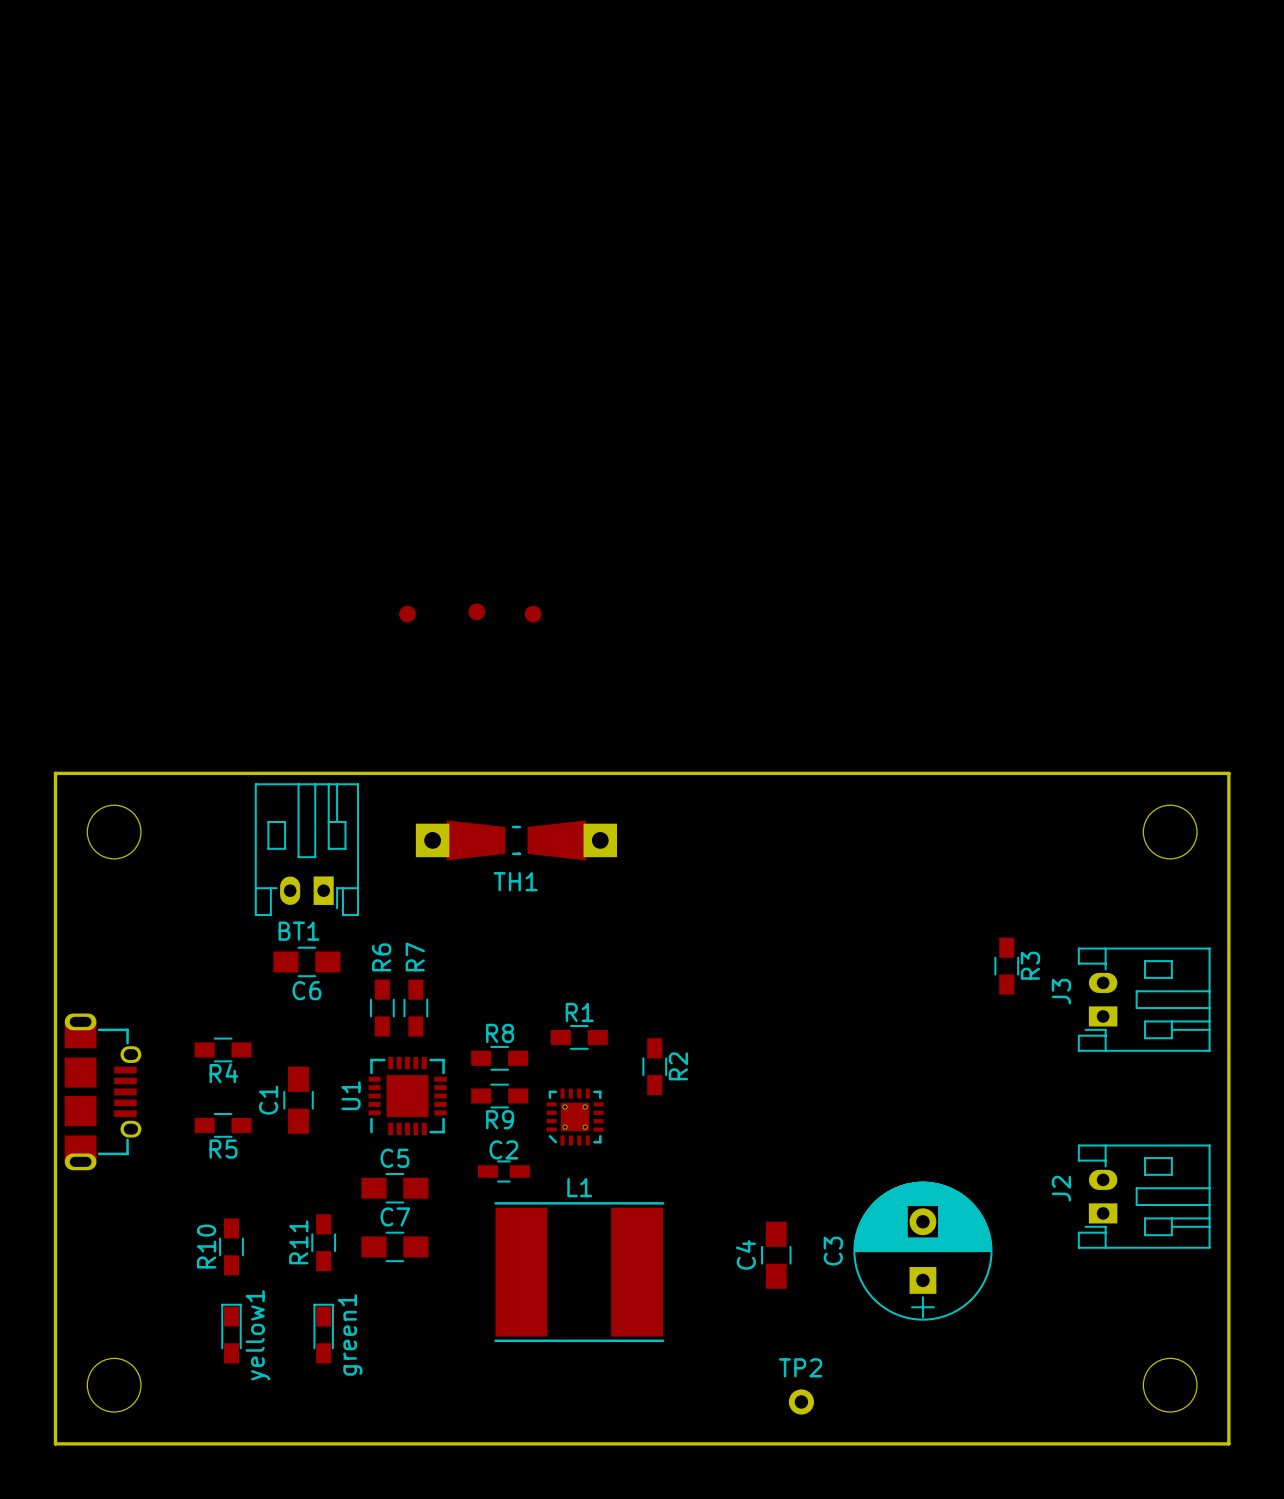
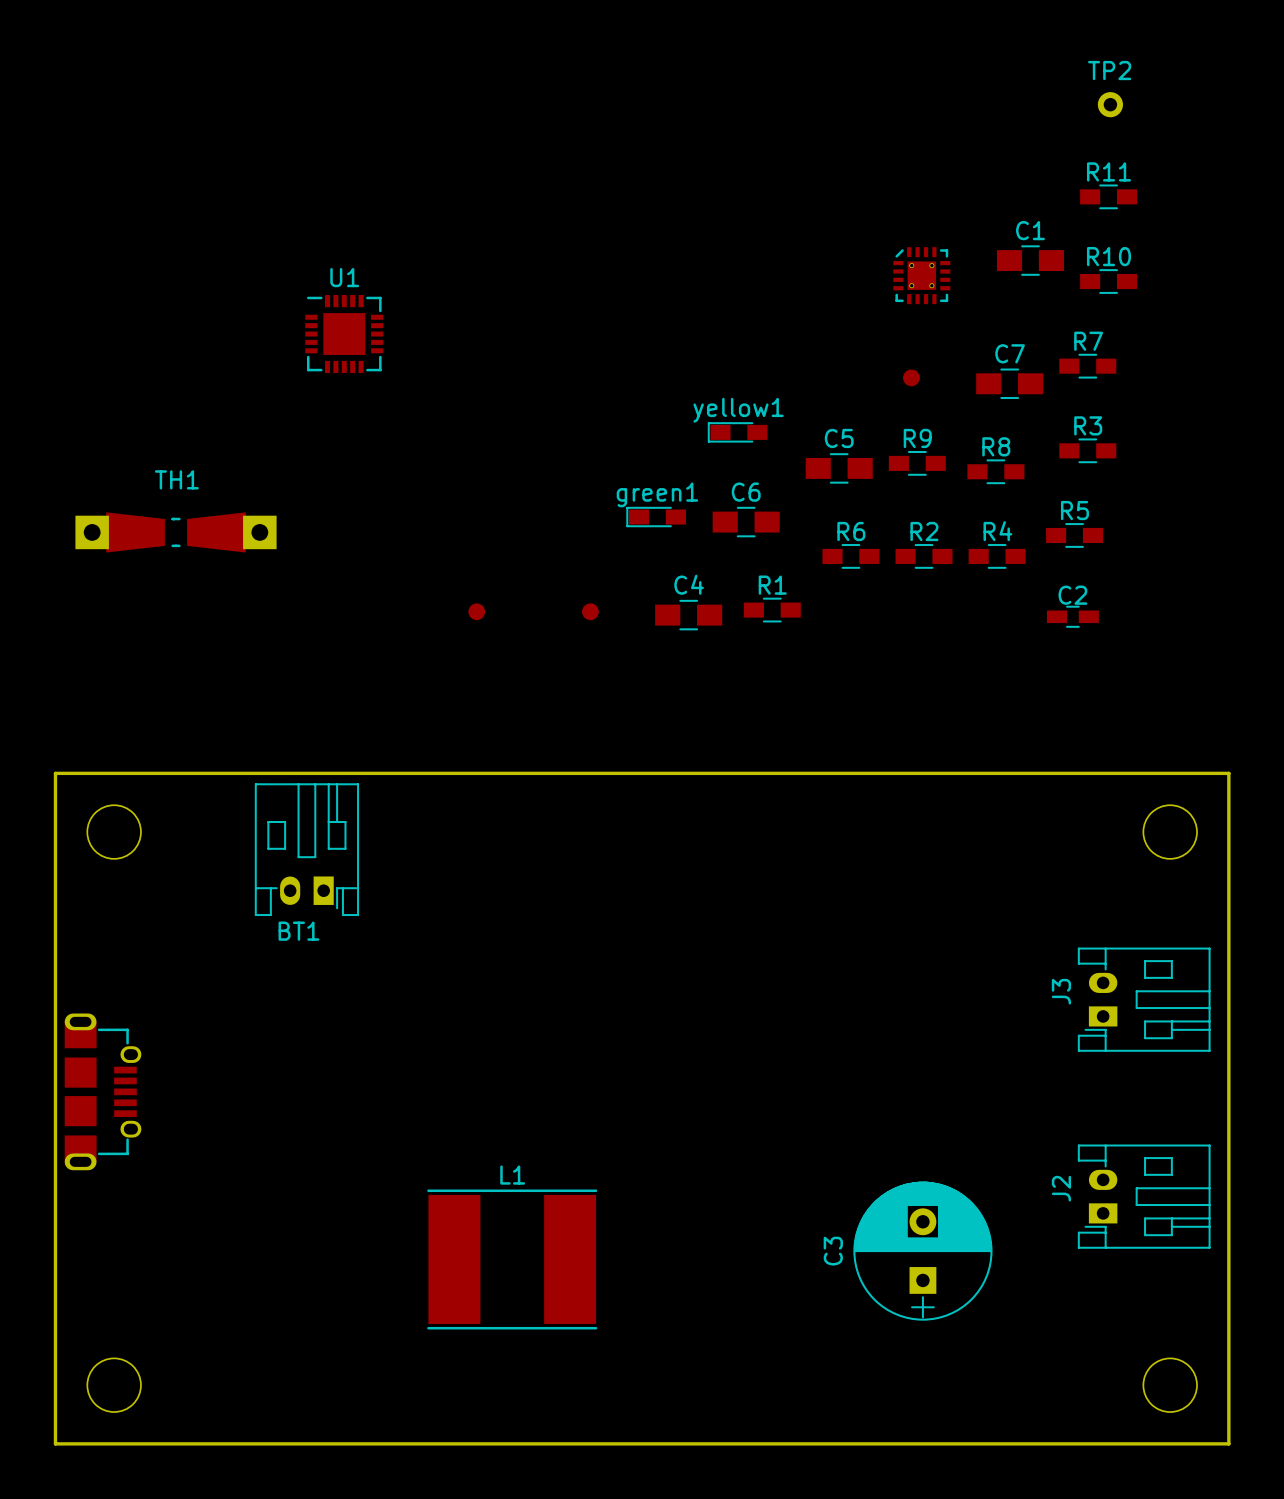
part: none -> (921, 275)
part: none -> (911, 377)
part: (407, 614) -> none
part position: (533, 614) -> (590, 611)
TH1 rotation: 0° (516, 840) -> 180° (176, 532)
TH1 position: (516, 840) -> (176, 532)
C6 position: (306, 961) -> (746, 522)
R3 name position: R3 (1030, 965) -> R3 (1088, 425)
R3 rotation: 0° (1006, 966) -> 90° clockwise (1087, 450)
R3 position: (1006, 966) -> (1087, 450)
C6 name position: C6 (306, 990) -> C6 (746, 492)
R6 rotation: 0° (382, 1008) -> 90° clockwise (850, 556)
R6 position: (382, 1008) -> (850, 556)
R7 rotation: 0° (415, 1008) -> 90° clockwise (1087, 366)
R7 position: (415, 1008) -> (1087, 366)
R1 position: (579, 1037) -> (772, 610)
R4 position: (223, 1049) -> (997, 556)
R8 position: (499, 1058) -> (995, 471)
R2 rotation: 0° (654, 1066) -> 90° clockwise (924, 556)
R2 position: (654, 1066) -> (924, 556)
R2 name position: R2 (678, 1066) -> R2 (924, 531)
R4 name position: R4 (223, 1073) -> R4 (997, 531)
U1 rotation: 0° (407, 1096) -> 90° clockwise (344, 334)
U1 position: (407, 1096) -> (344, 334)
R9 position: (499, 1096) -> (917, 463)
C1 rotation: 0° (298, 1100) -> 90° clockwise (1030, 260)
C1 position: (298, 1100) -> (1030, 260)
part: (575, 1117) -> none
R9 name position: R9 (500, 1119) -> R9 (917, 438)
R5 position: (223, 1125) -> (1074, 535)
R5 name position: R5 (223, 1149) -> R5 (1074, 510)
C2 position: (503, 1171) -> (1072, 616)
C5 position: (394, 1188) -> (839, 468)
R11 rotation: 0° (323, 1242) -> 90° clockwise (1108, 196)
R11 position: (323, 1242) -> (1108, 196)
R10 rotation: 0° (231, 1246) -> 90° clockwise (1108, 281)
R10 position: (231, 1246) -> (1108, 281)
C7 position: (394, 1246) -> (1009, 383)
C4 rotation: 0° (776, 1255) -> 90° clockwise (688, 615)
C4 position: (776, 1255) -> (688, 615)
L1 position: (579, 1272) -> (512, 1259)
yellow1 rotation: 0° (231, 1333) -> 90° counterclockwise (737, 432)
yellow1 position: (231, 1333) -> (737, 432)
green1 rotation: 0° (323, 1333) -> 90° counterclockwise (656, 517)
green1 position: (323, 1333) -> (656, 517)
TP2 position: (801, 1401) -> (1110, 104)

